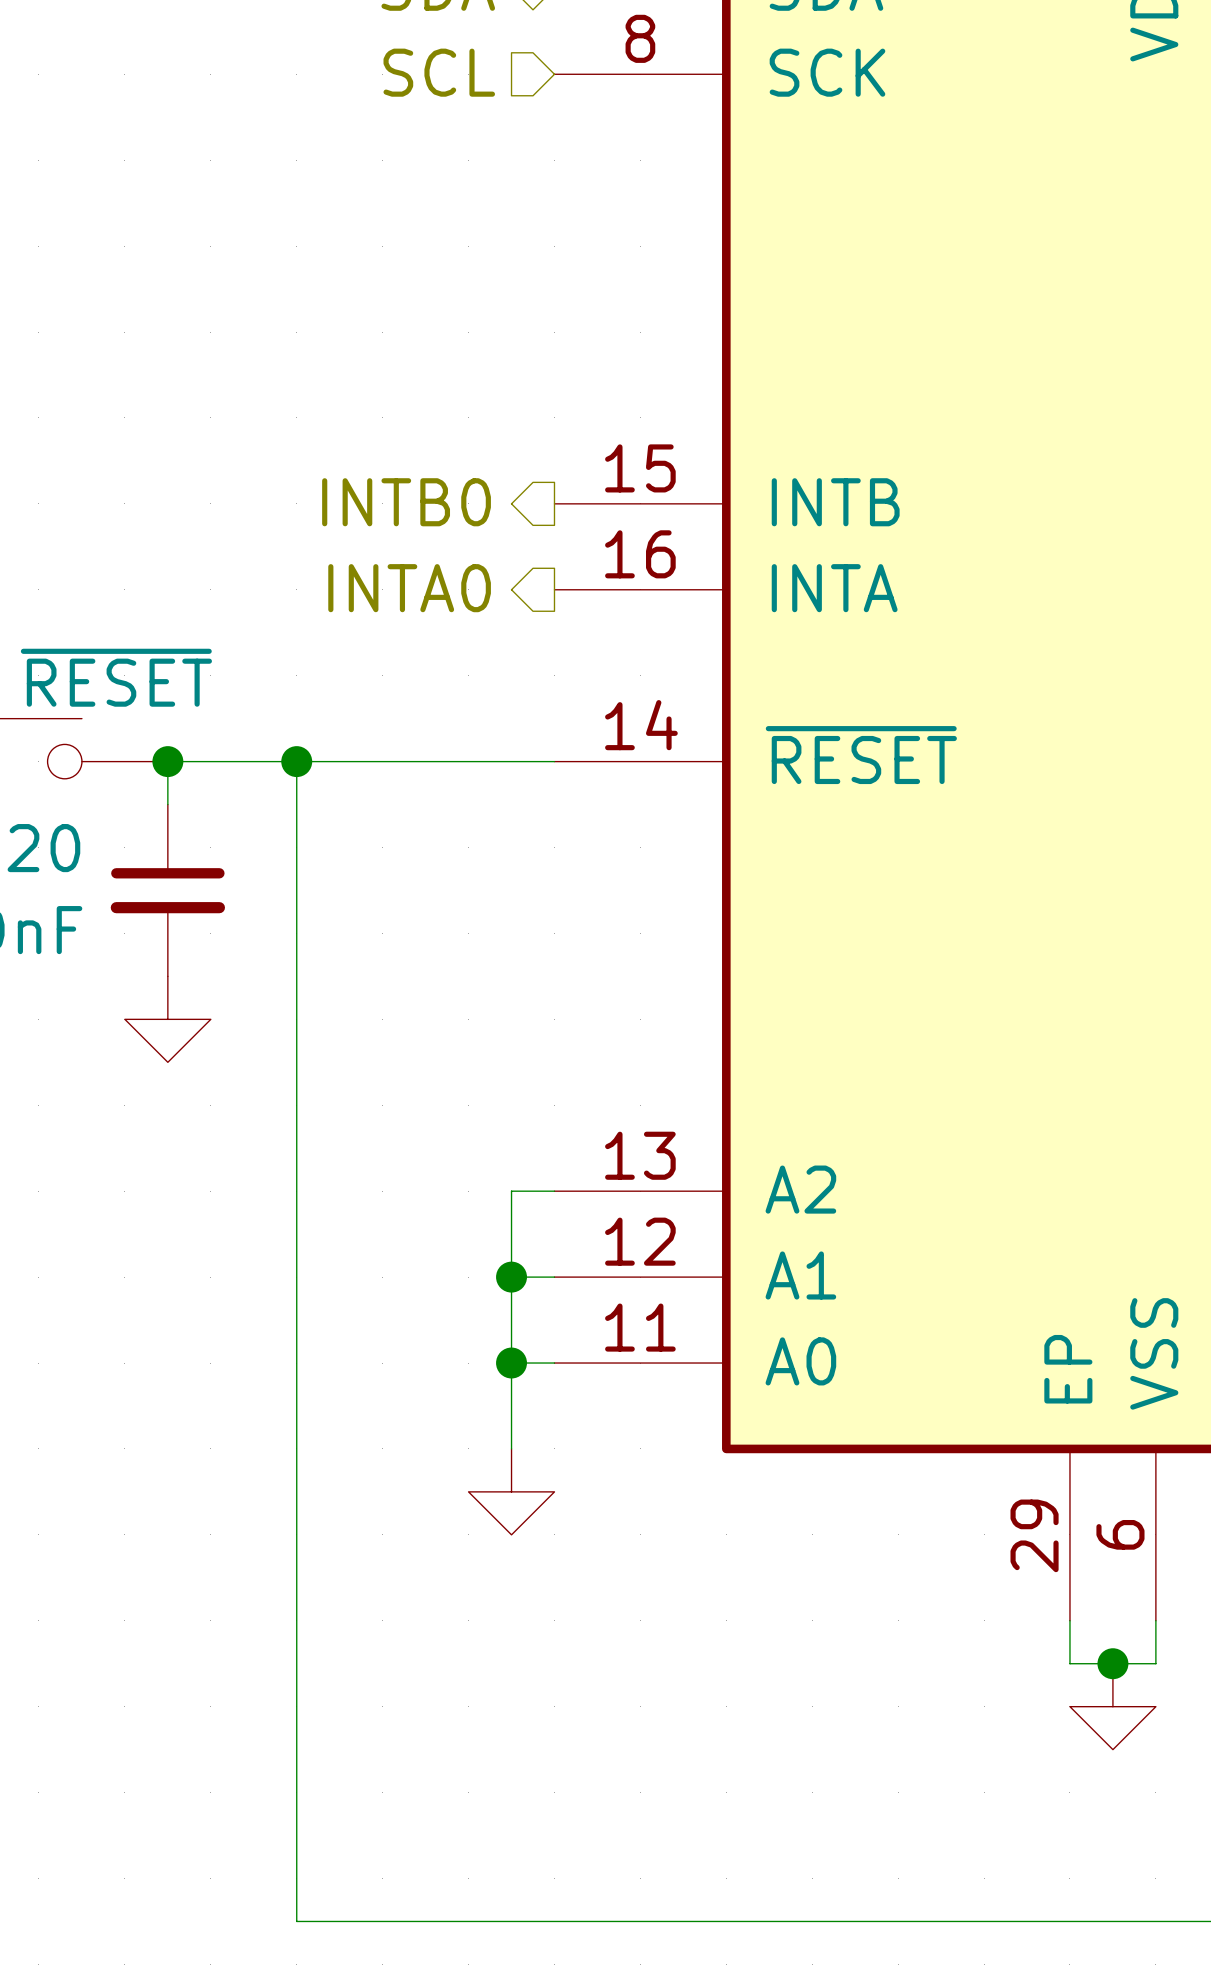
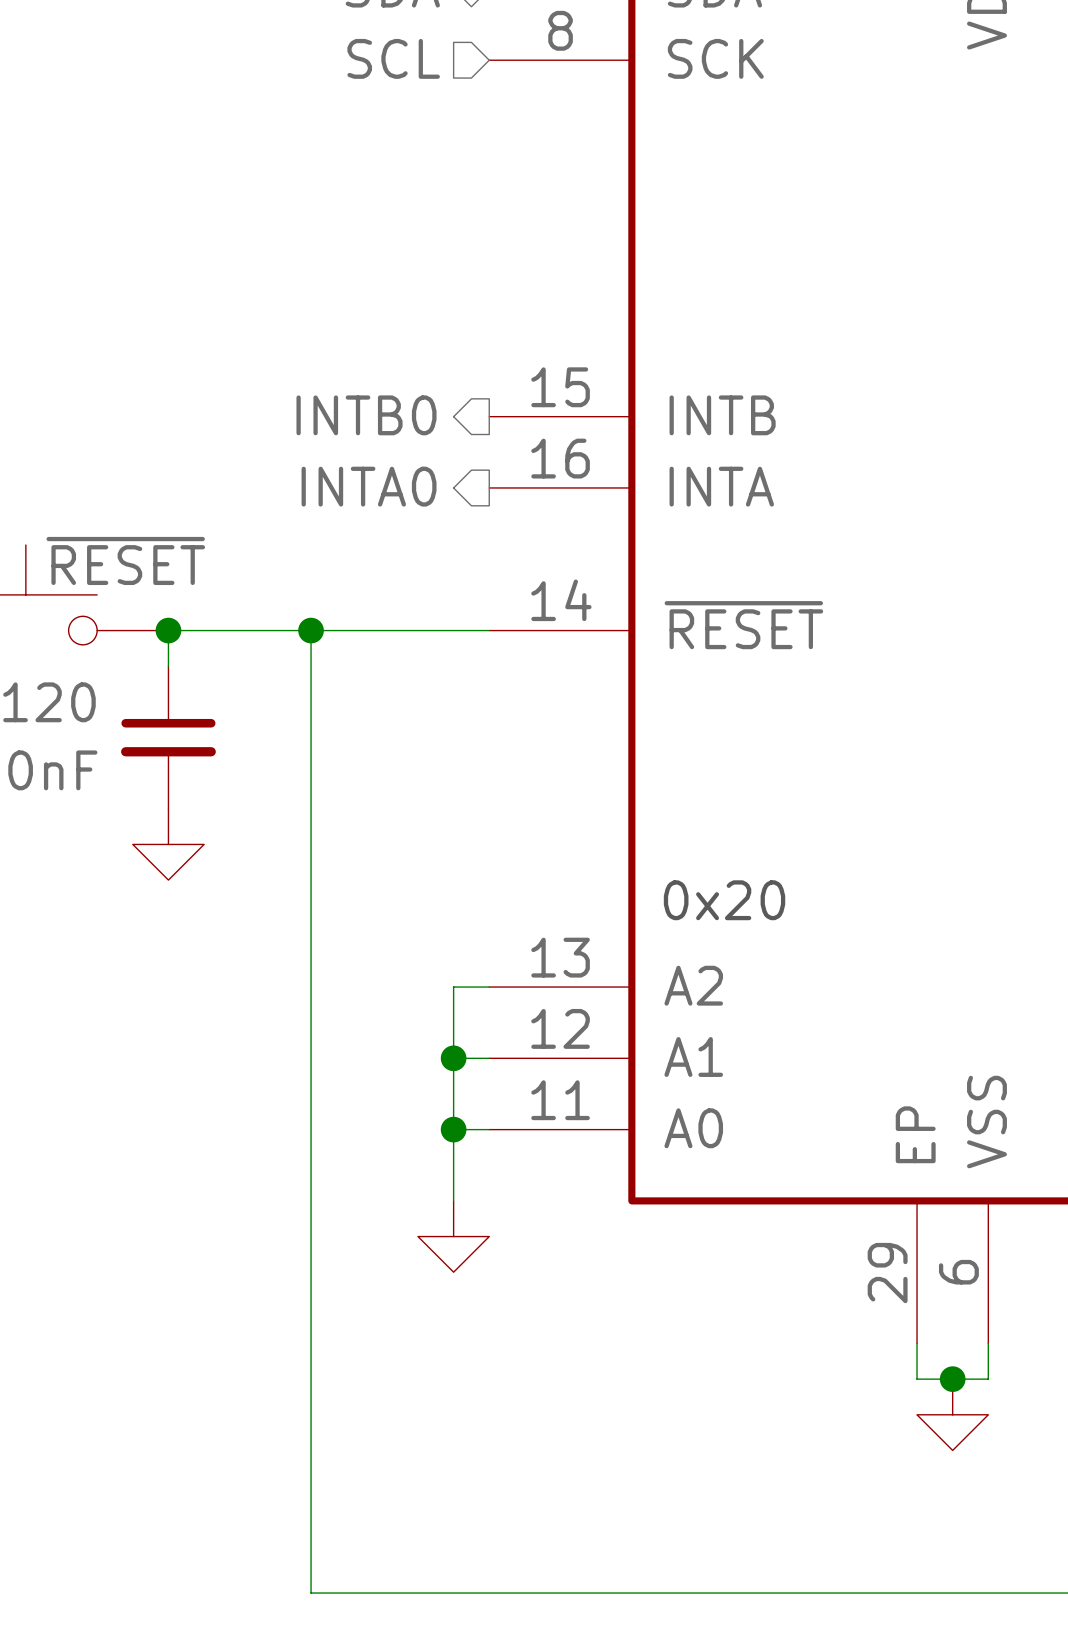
wire: (296, 761) (296, 1921) (339, 1921) -> (311, 630) (311, 1593)
junction position: (296, 761) -> (311, 630)
text: none -> 0x20 (724, 900)

